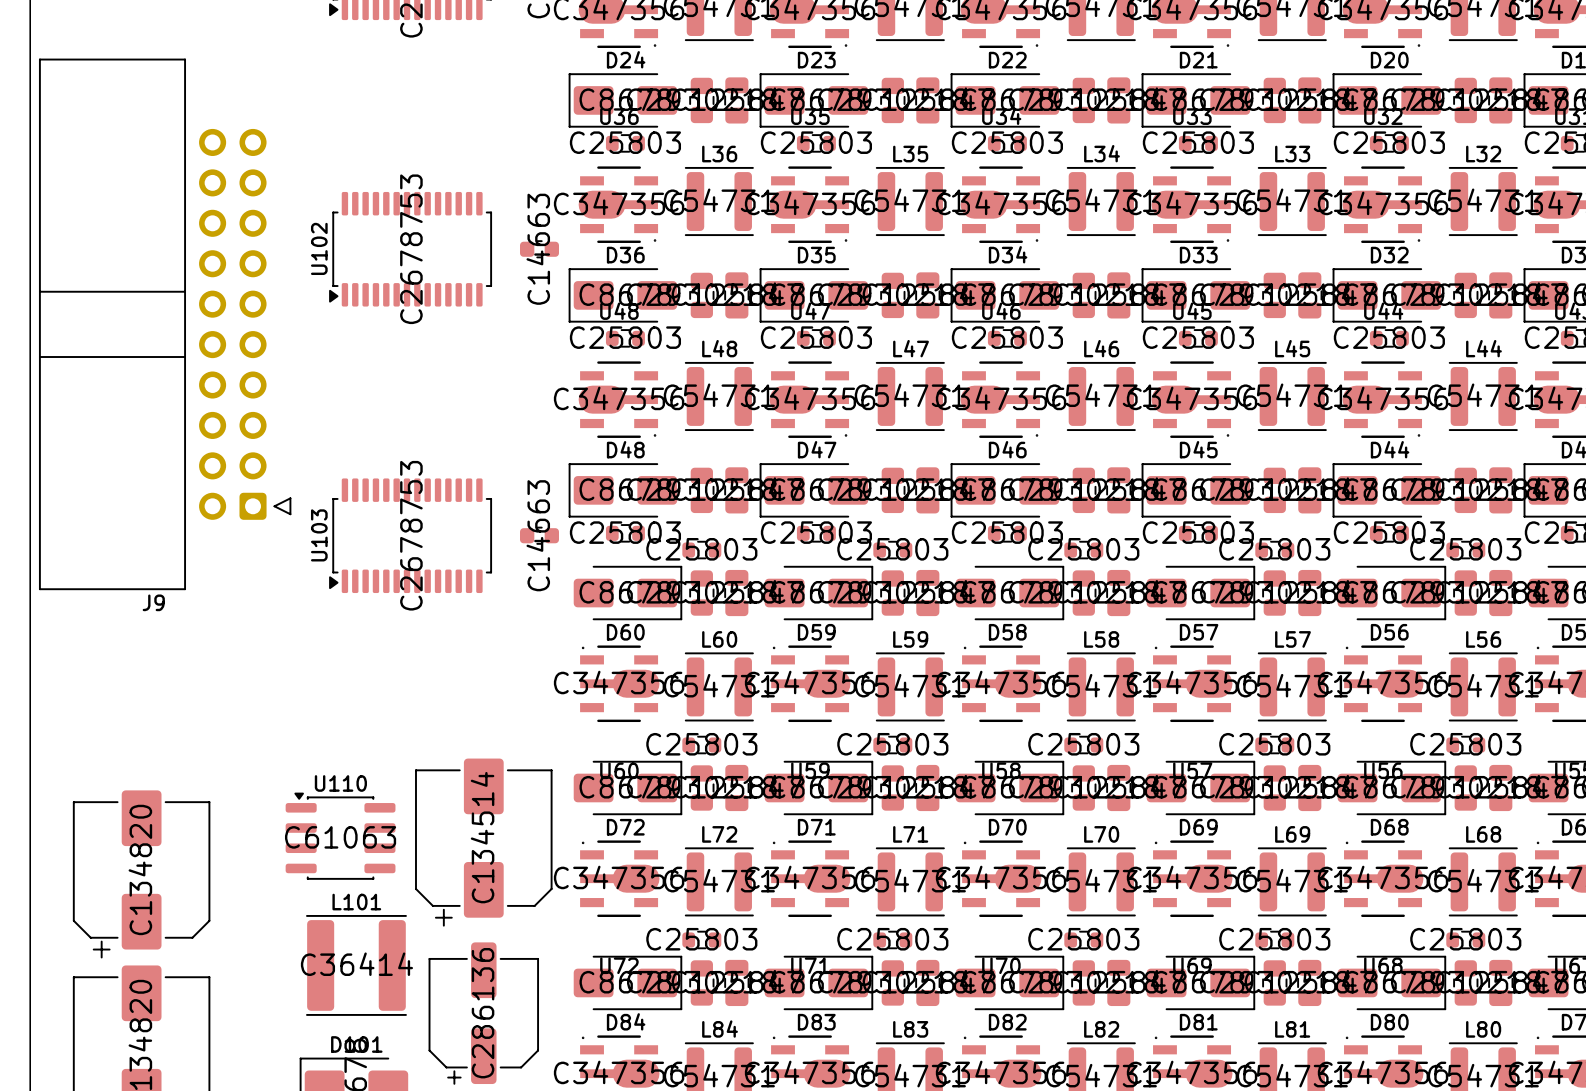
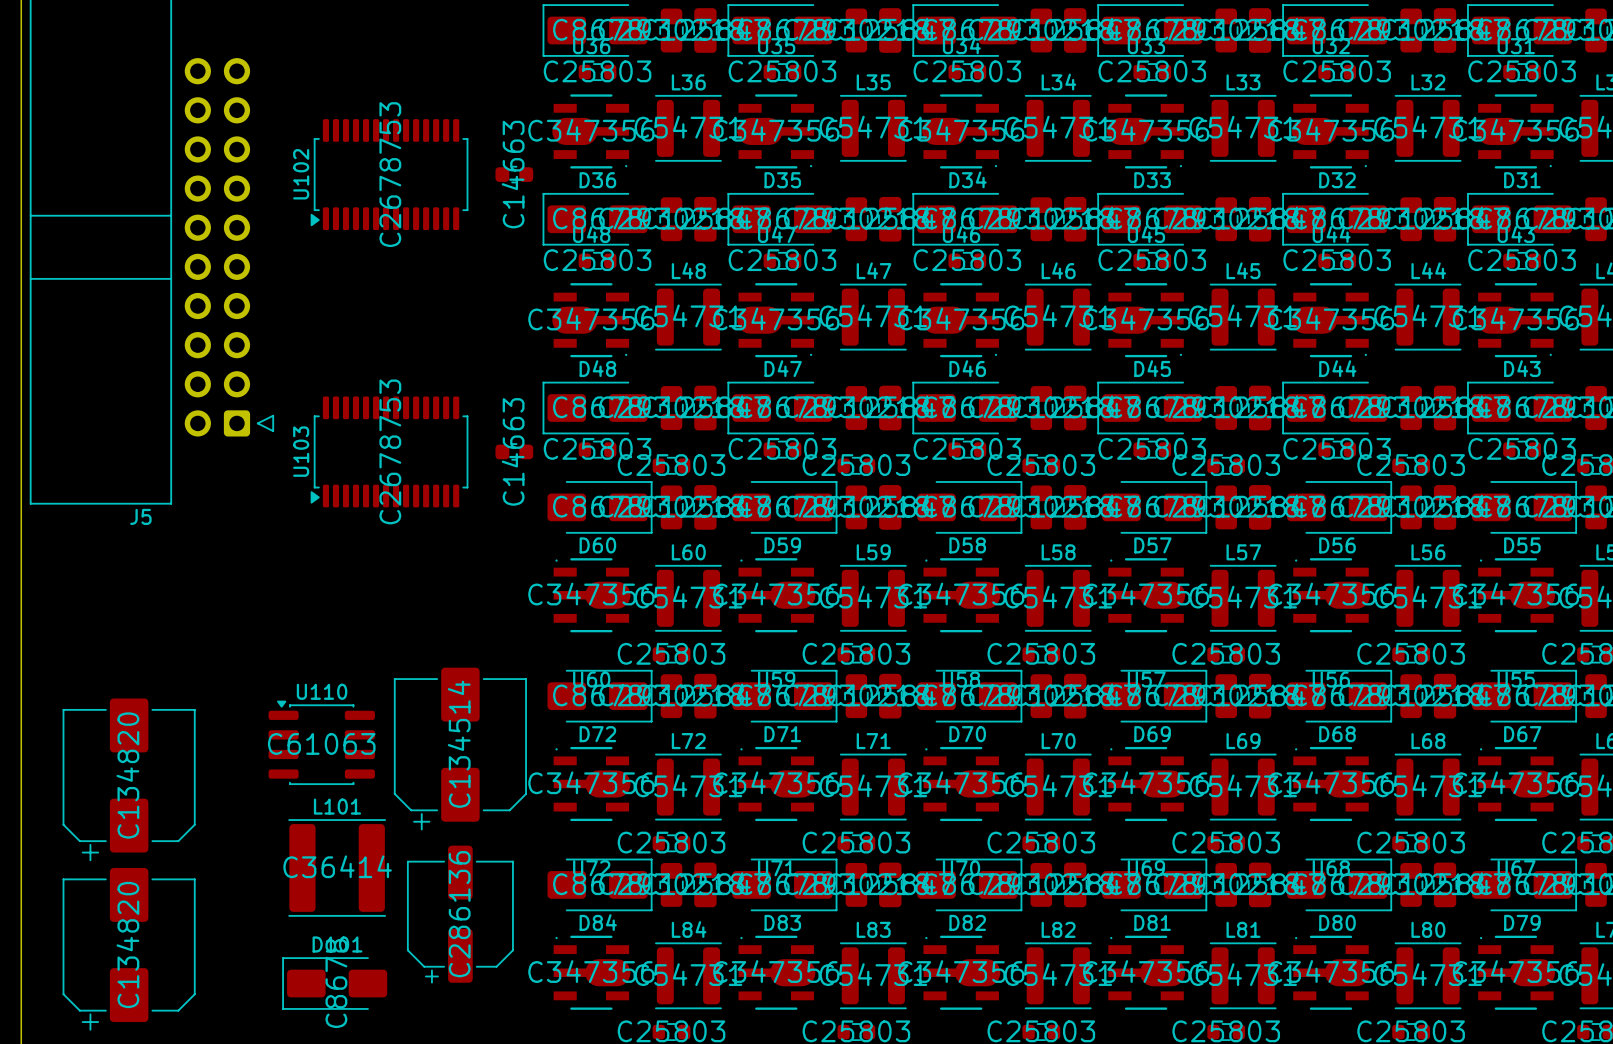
J9 name: J9 (153, 602) -> J5 (140, 516)

